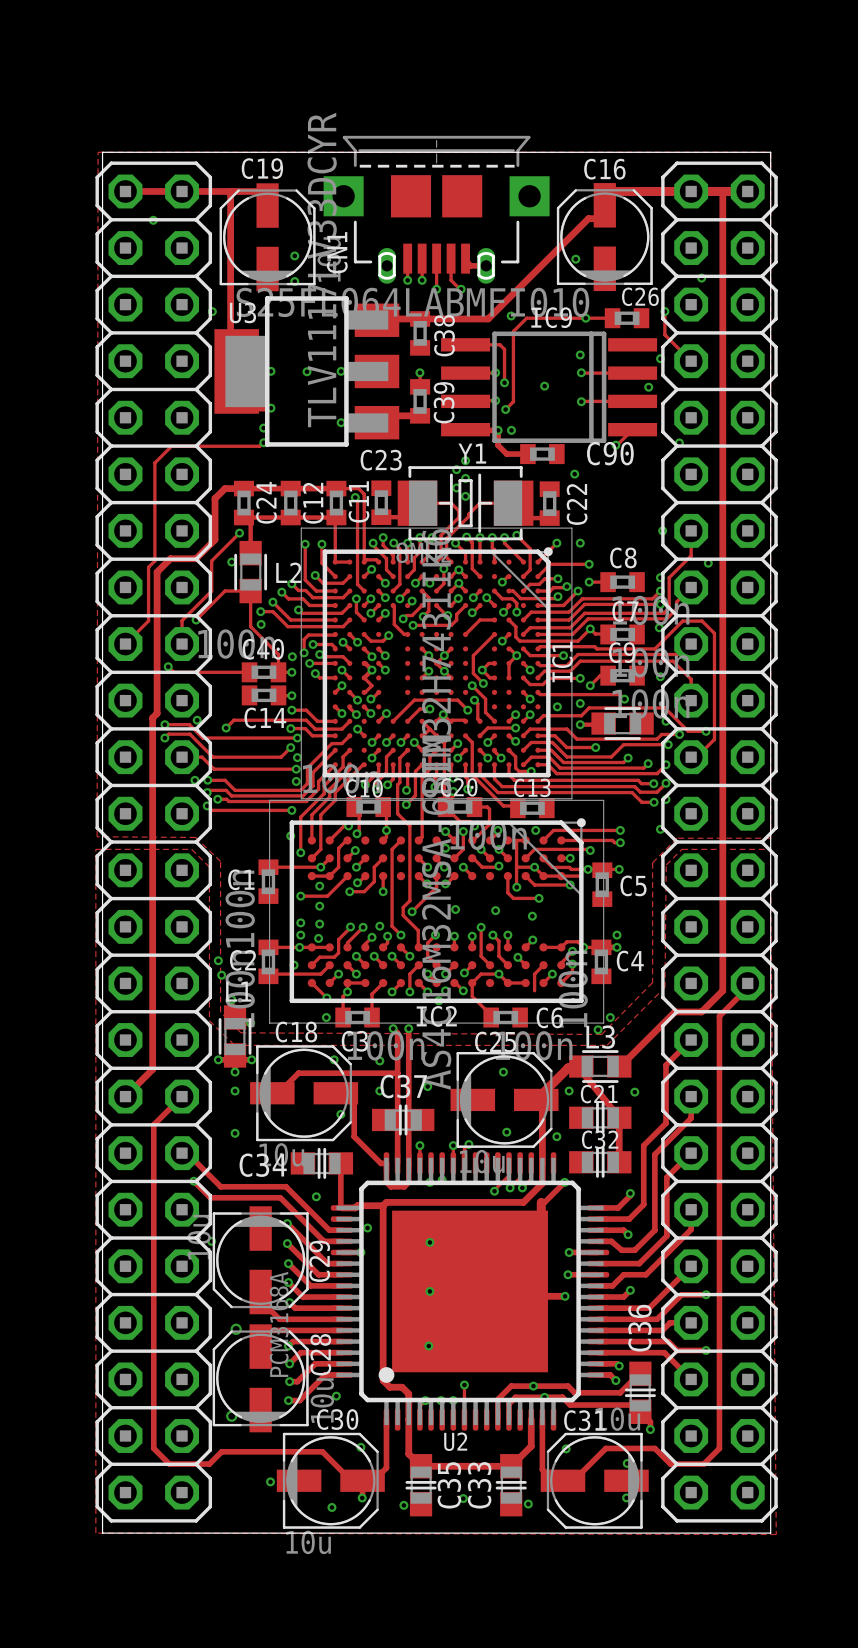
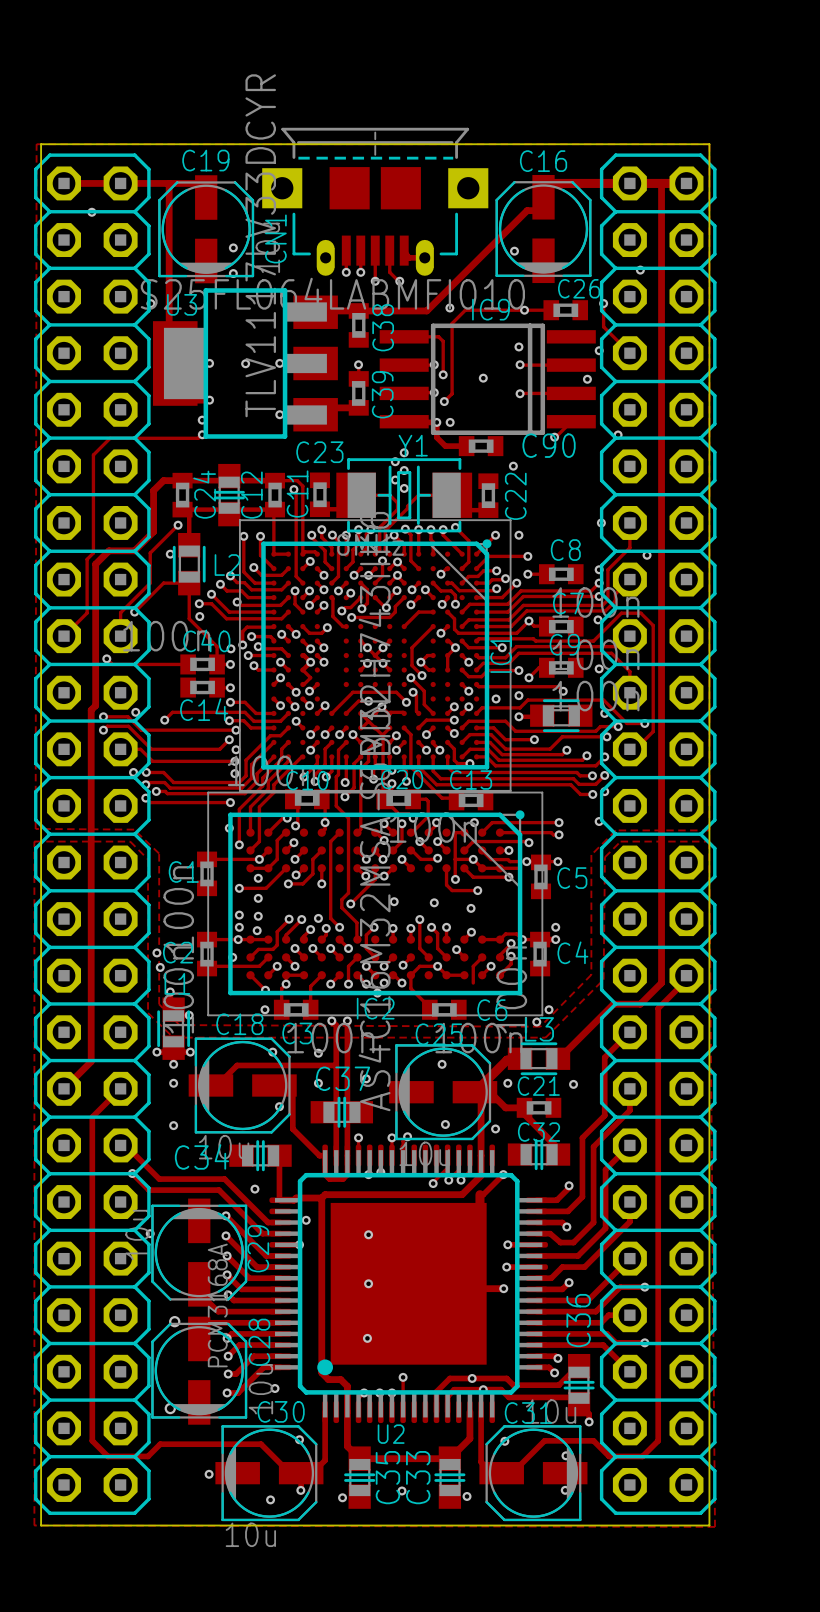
C12 footprint: [280, 480, 301, 526] -> [213, 463, 245, 527]
track: (581, 1066) (581, 1070) (619, 1117) (619, 1156) -> (478, 1089) (486, 1089) (505, 1107) (524, 1107) (524, 1114) (557, 1148)
C21 footprint: [569, 1102, 632, 1134] -> [516, 1097, 562, 1118]

